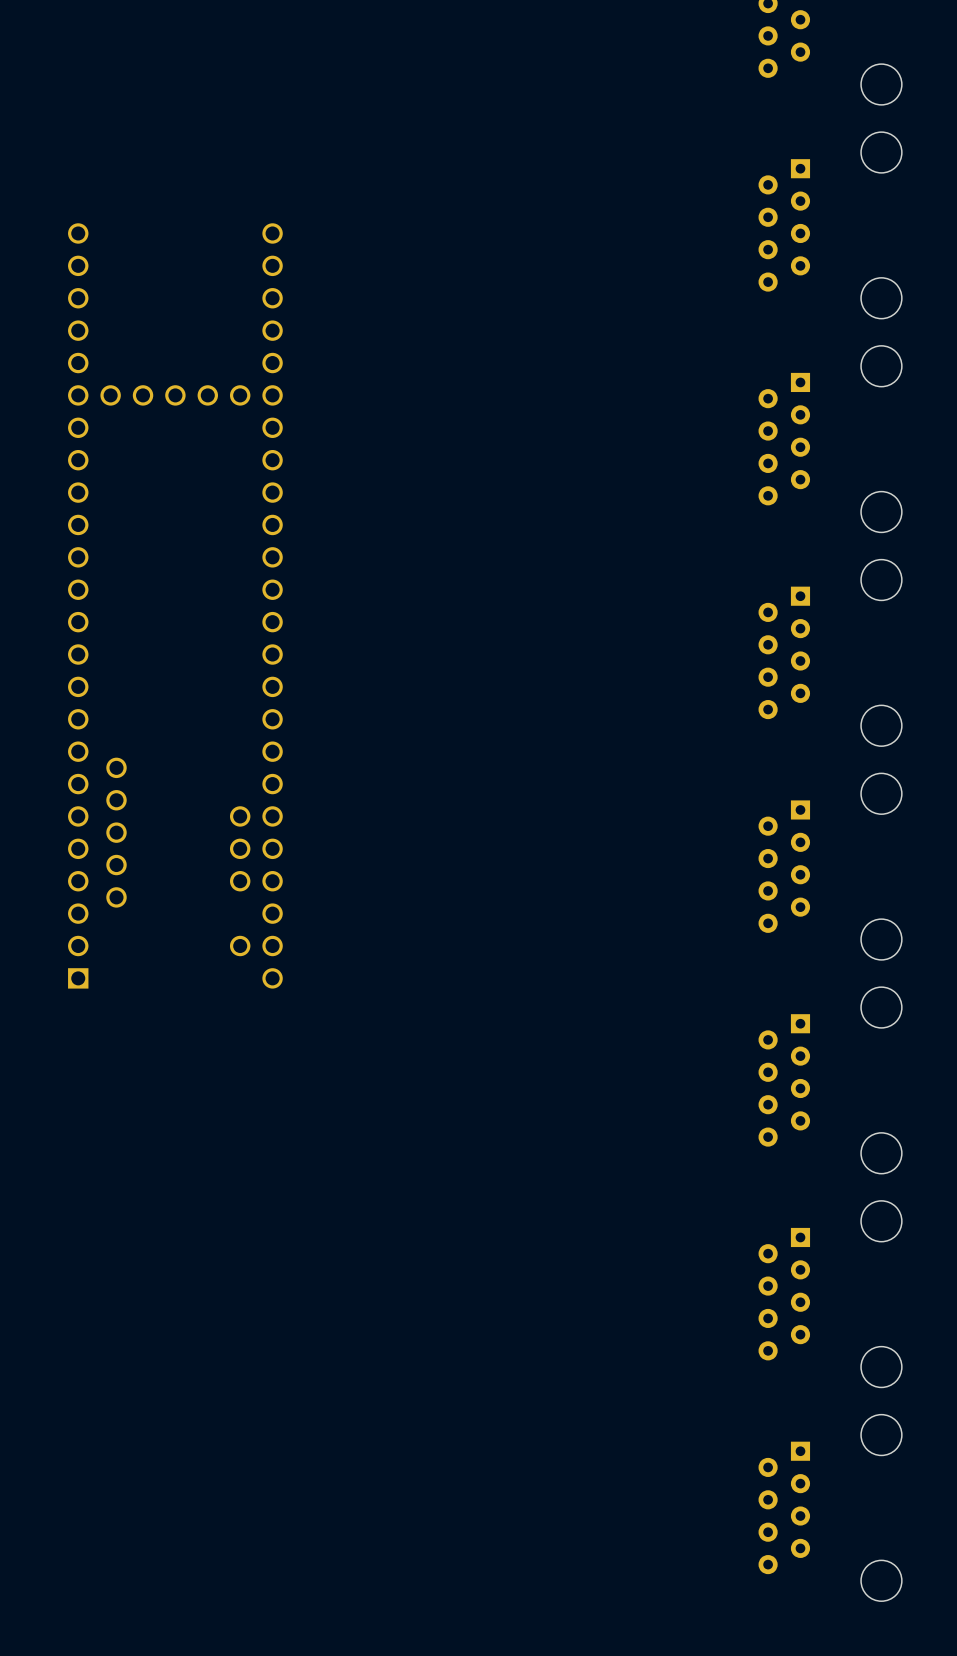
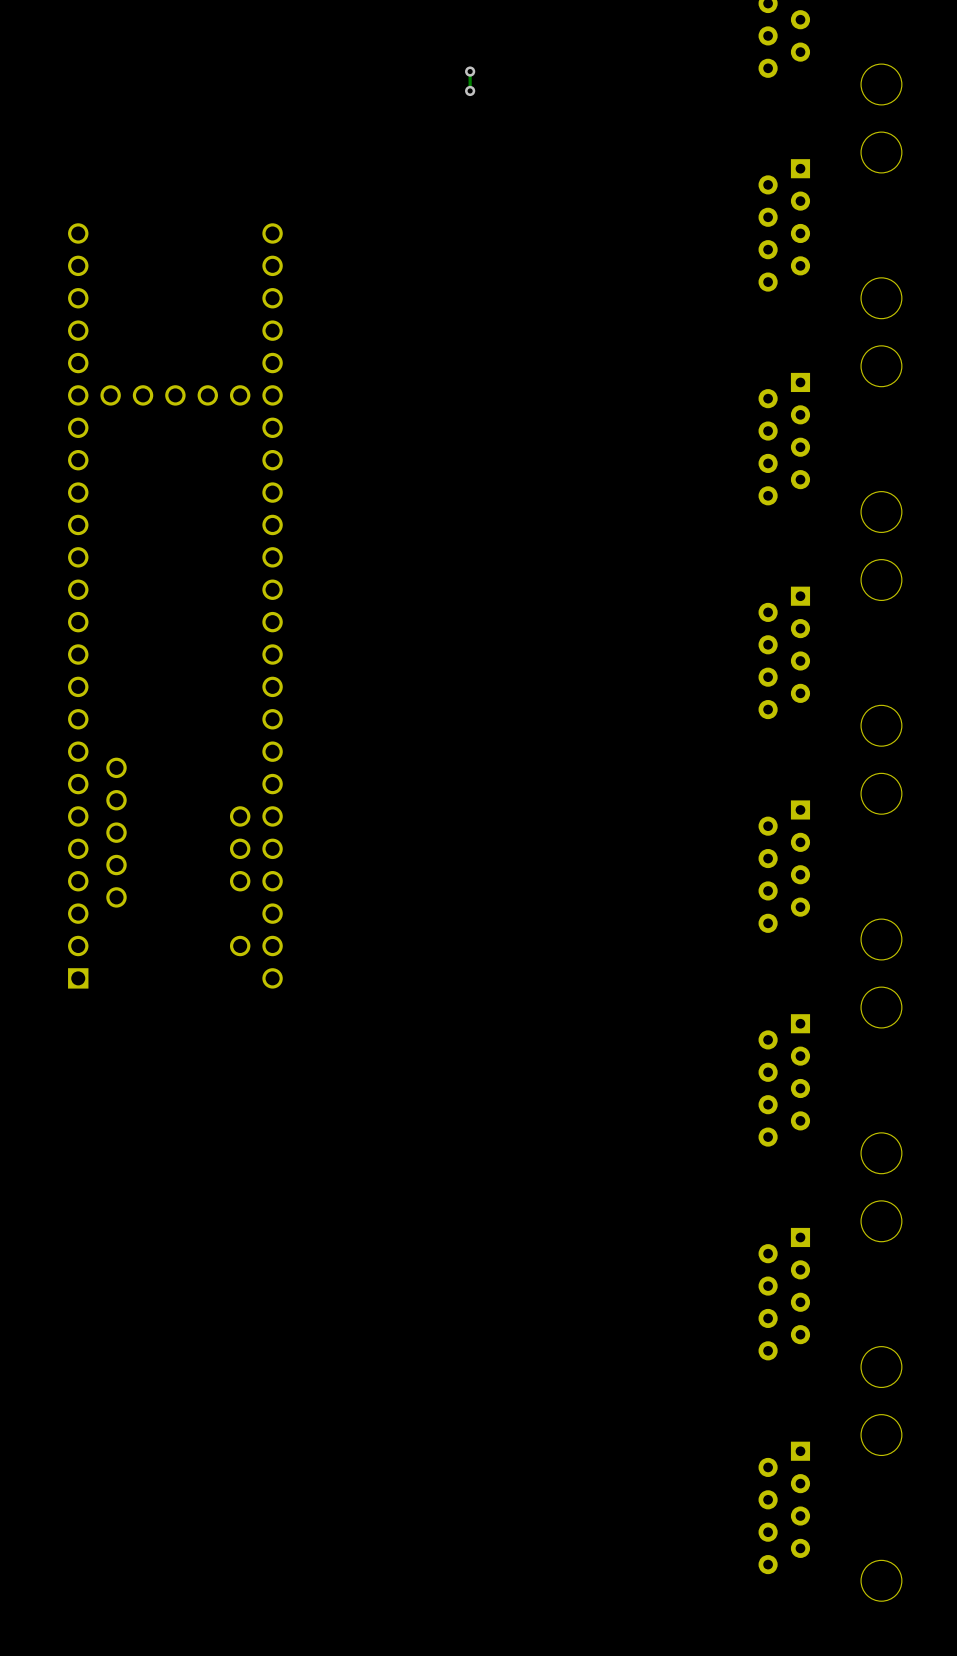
track: none -> (470, 71) (470, 87)
via: none -> (470, 71)
via: none -> (470, 90)

